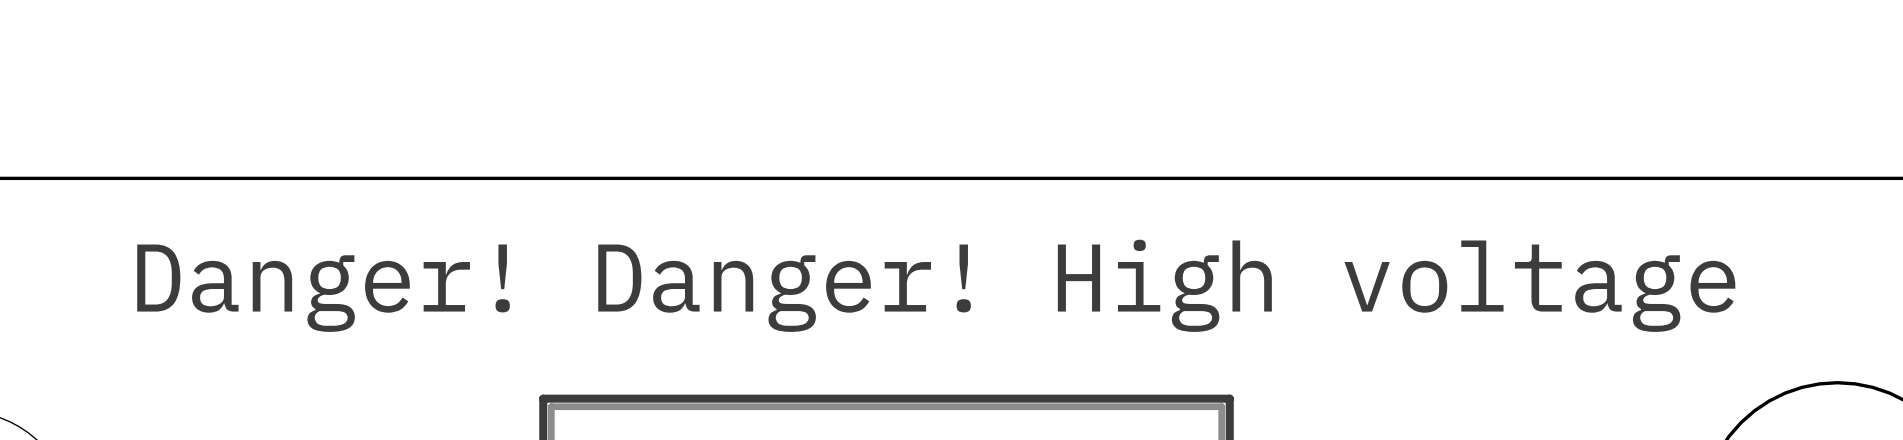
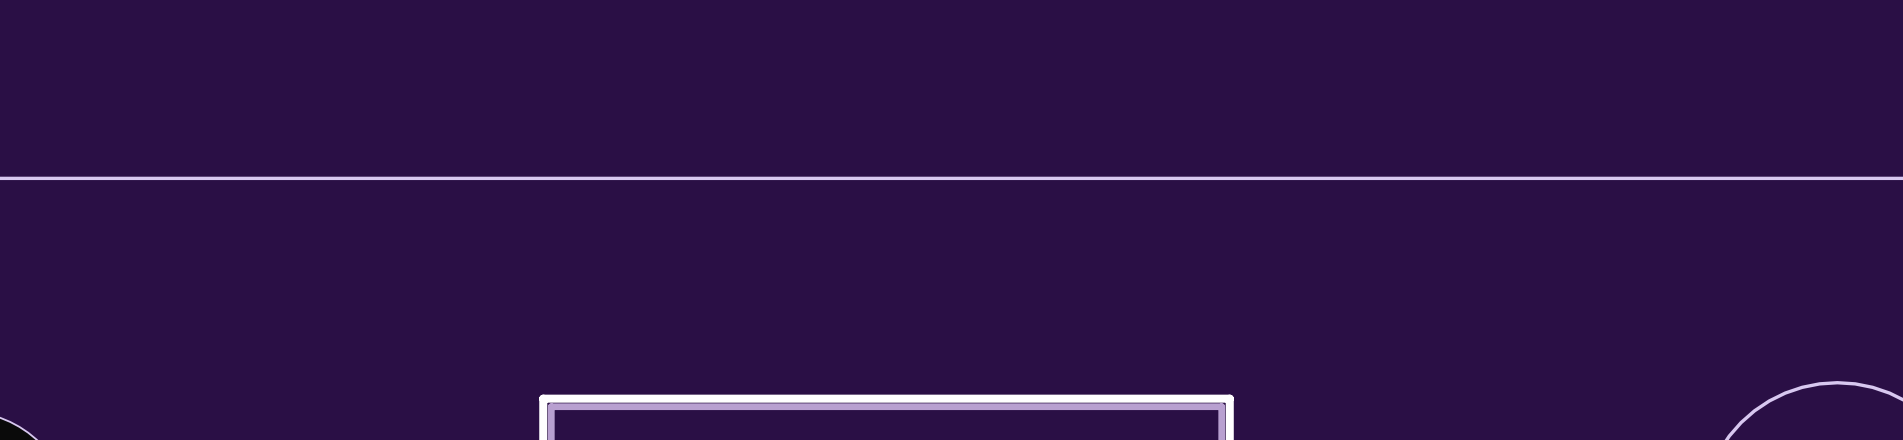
text: Danger! Danger! High voltage (936, 285) -> none

